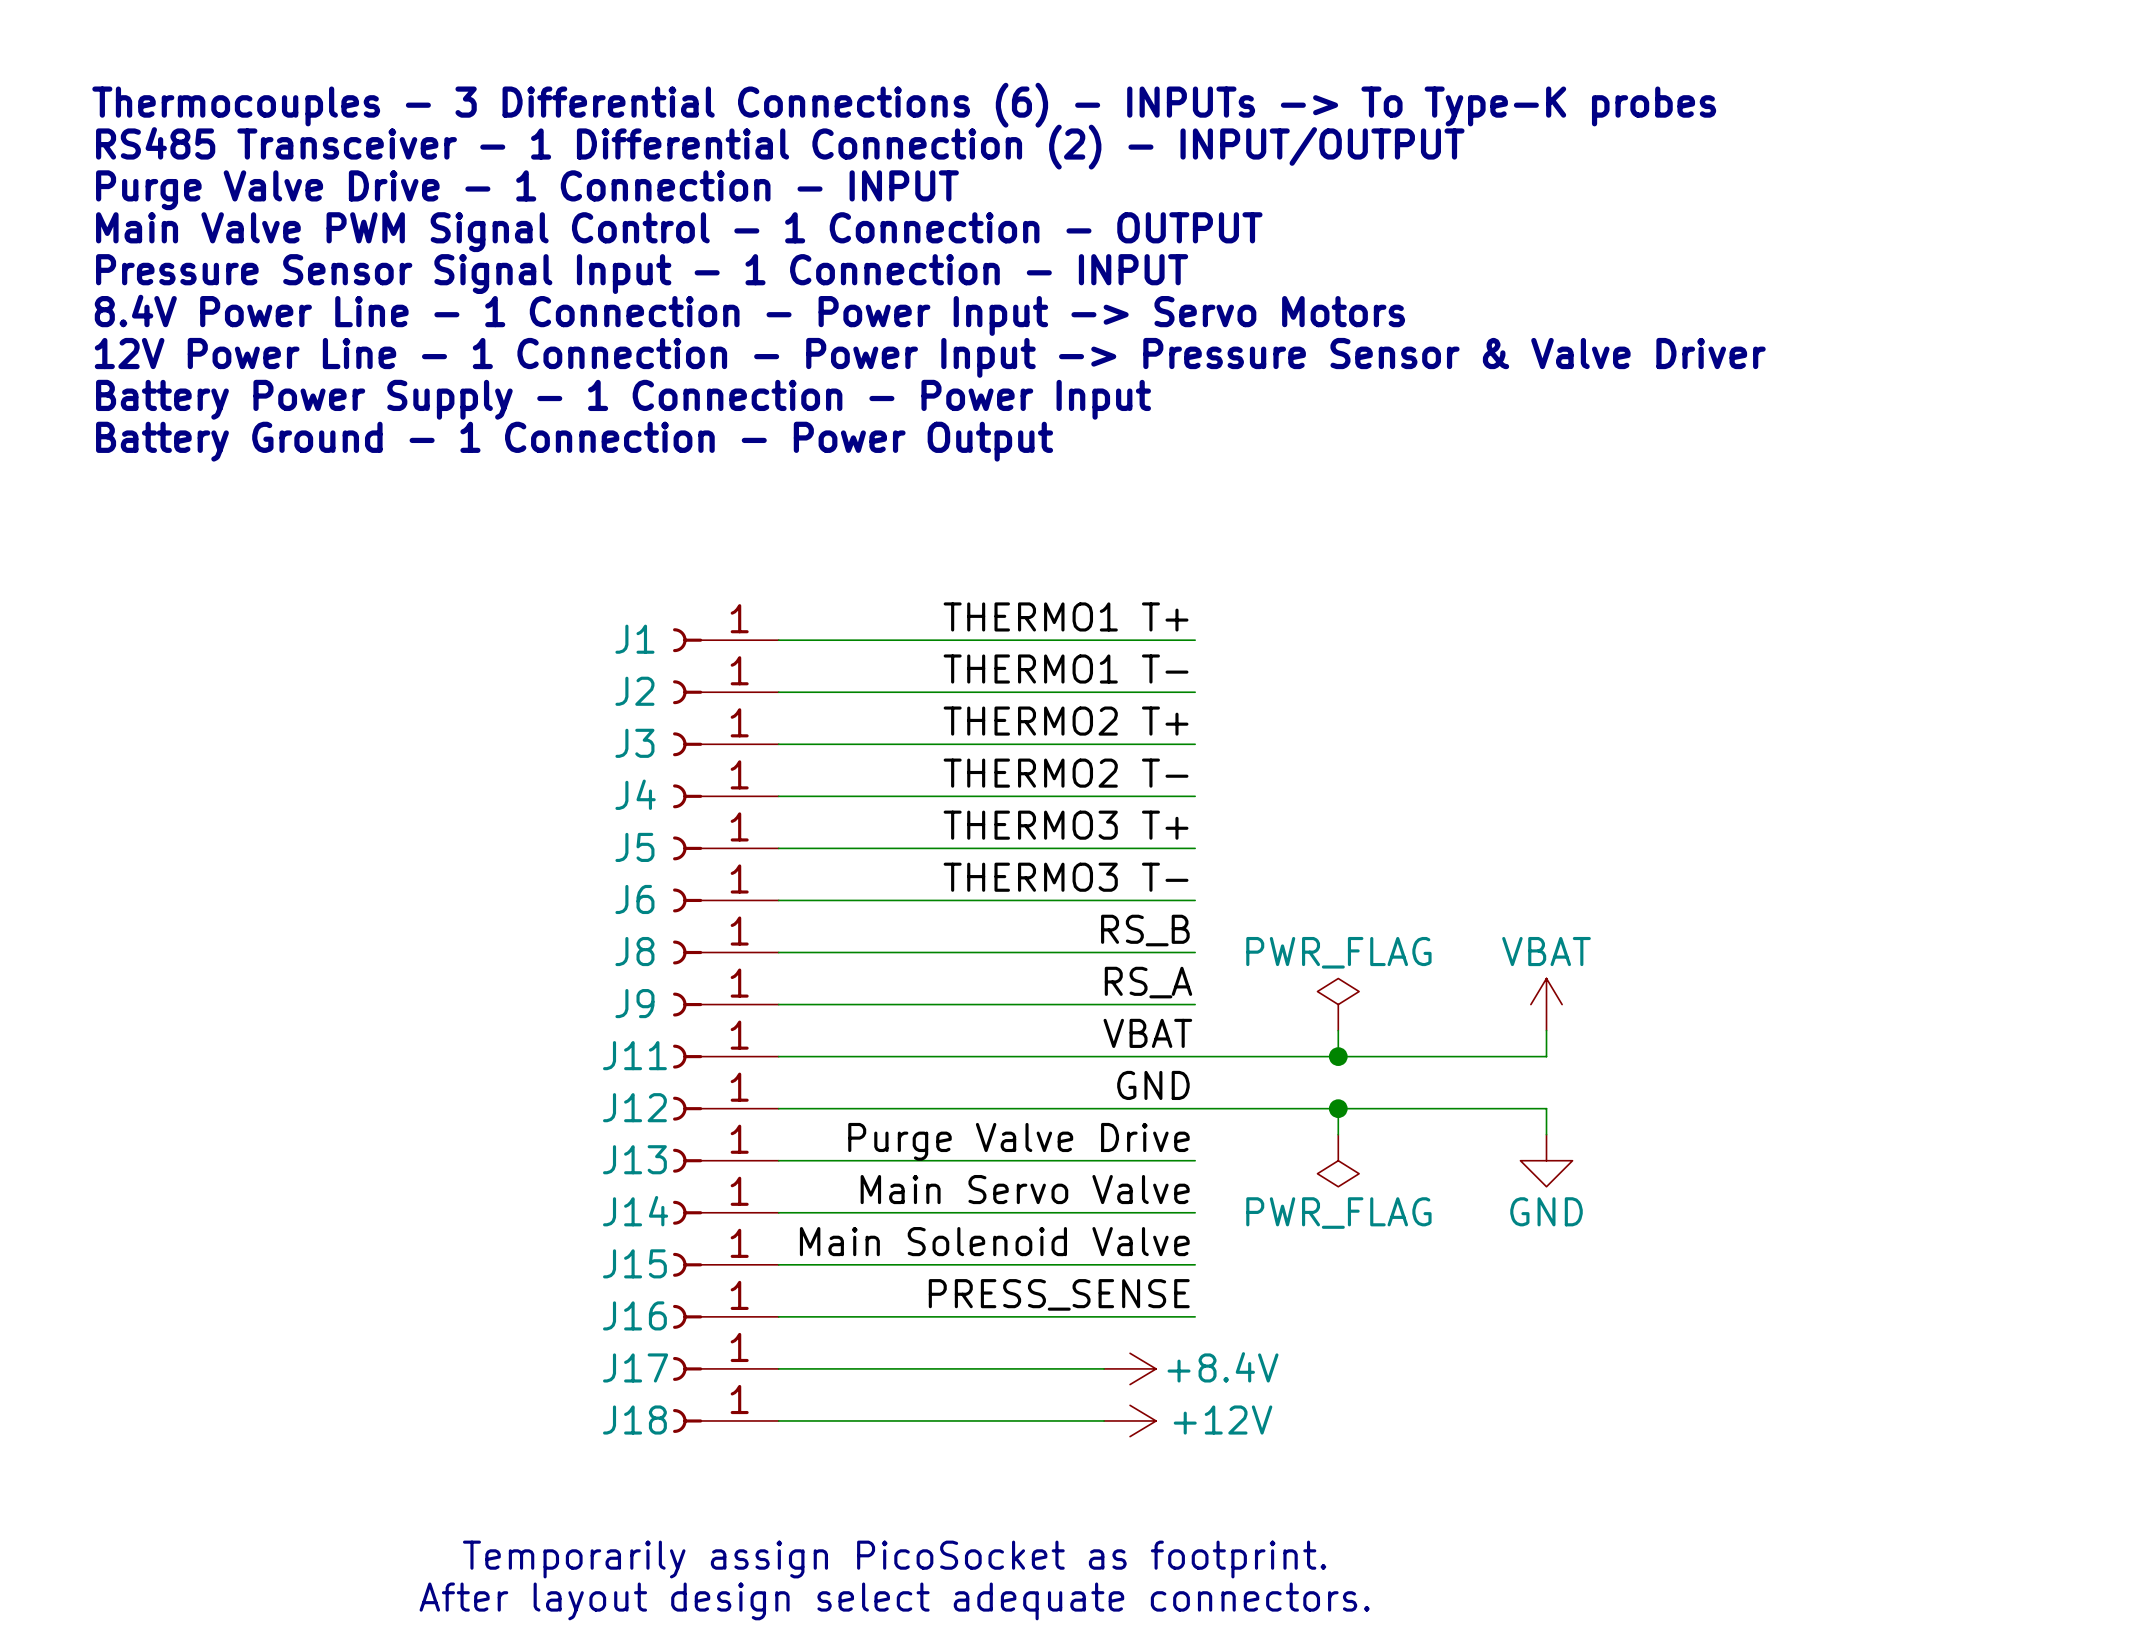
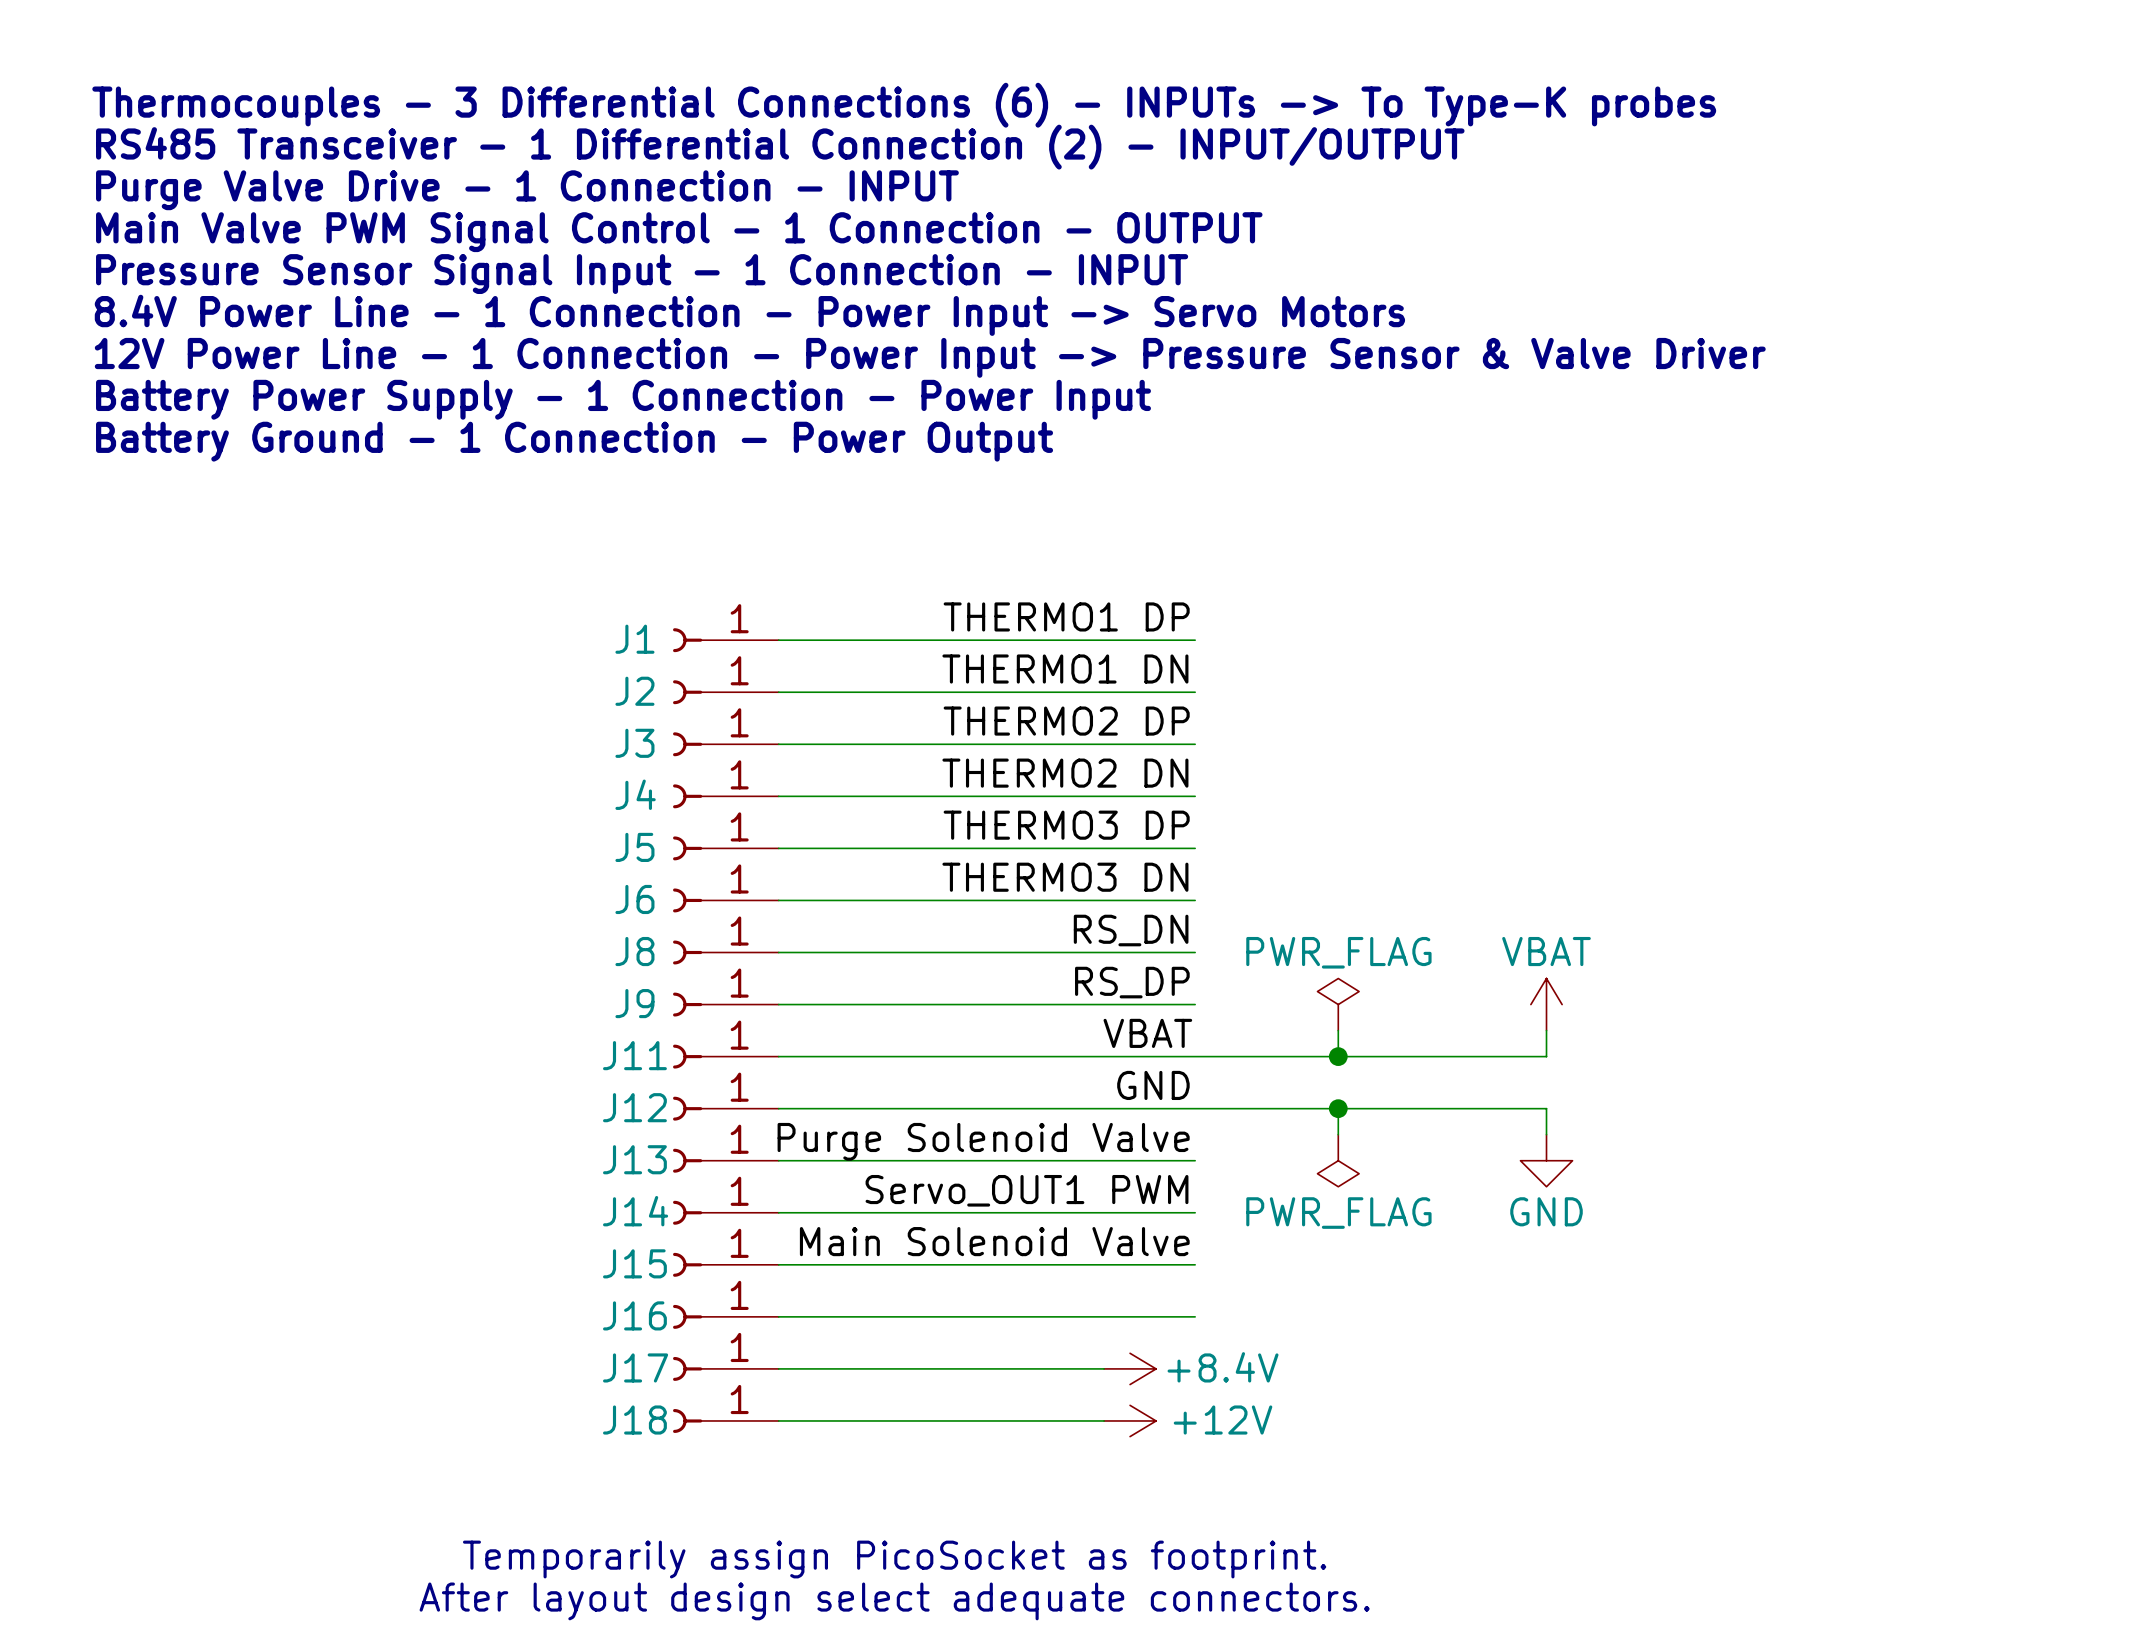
label: THERMO1 T+ (1066, 616) -> THERMO1 DP (1066, 616)
label: THERMO1 T- (1066, 669) -> THERMO1 DN (1065, 669)
label: THERMO2 T+ (1066, 721) -> THERMO2 DP (1066, 721)
label: THERMO2 T- (1066, 773) -> THERMO2 DN (1065, 773)
label: THERMO3 T+ (1066, 825) -> THERMO3 DP (1066, 825)
label: THERMO3 T- (1066, 877) -> THERMO3 DN (1065, 877)
label: RS_B (1145, 930) -> RS_DN (1131, 930)
label: RS_A (1148, 982) -> RS_DP (1132, 982)
label: Purge Valve Drive (1018, 1141) -> Purge Solenoid Valve (983, 1141)
label: Main Servo Valve (1025, 1189) -> Servo_OUT1 PWM (1027, 1190)
label: PRESS_SENSE (1059, 1294) -> none

